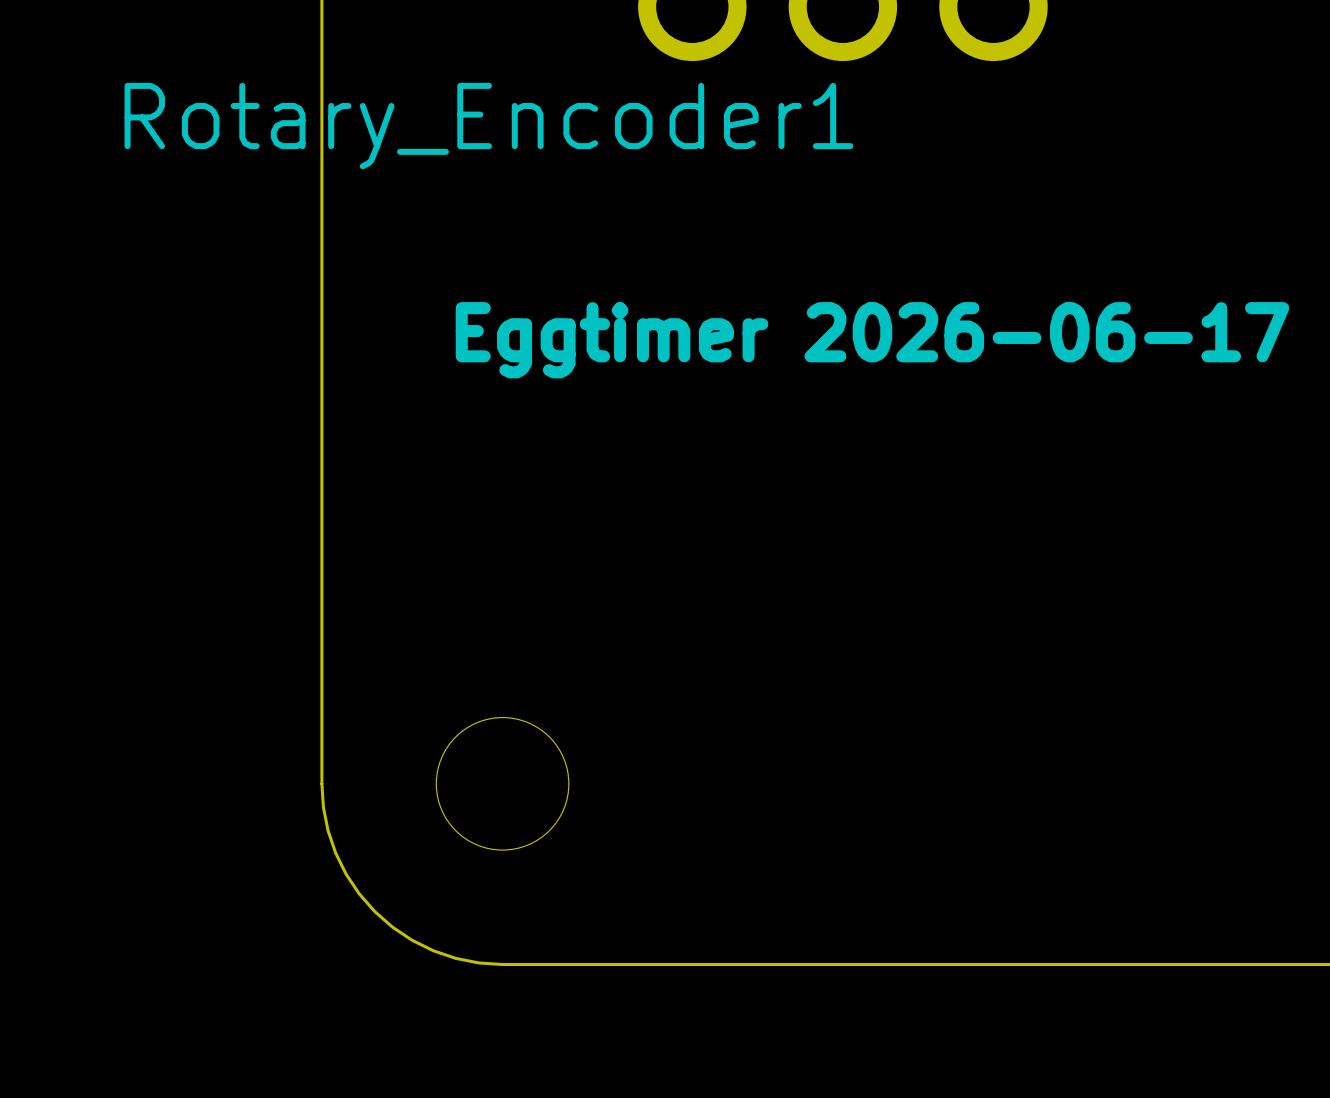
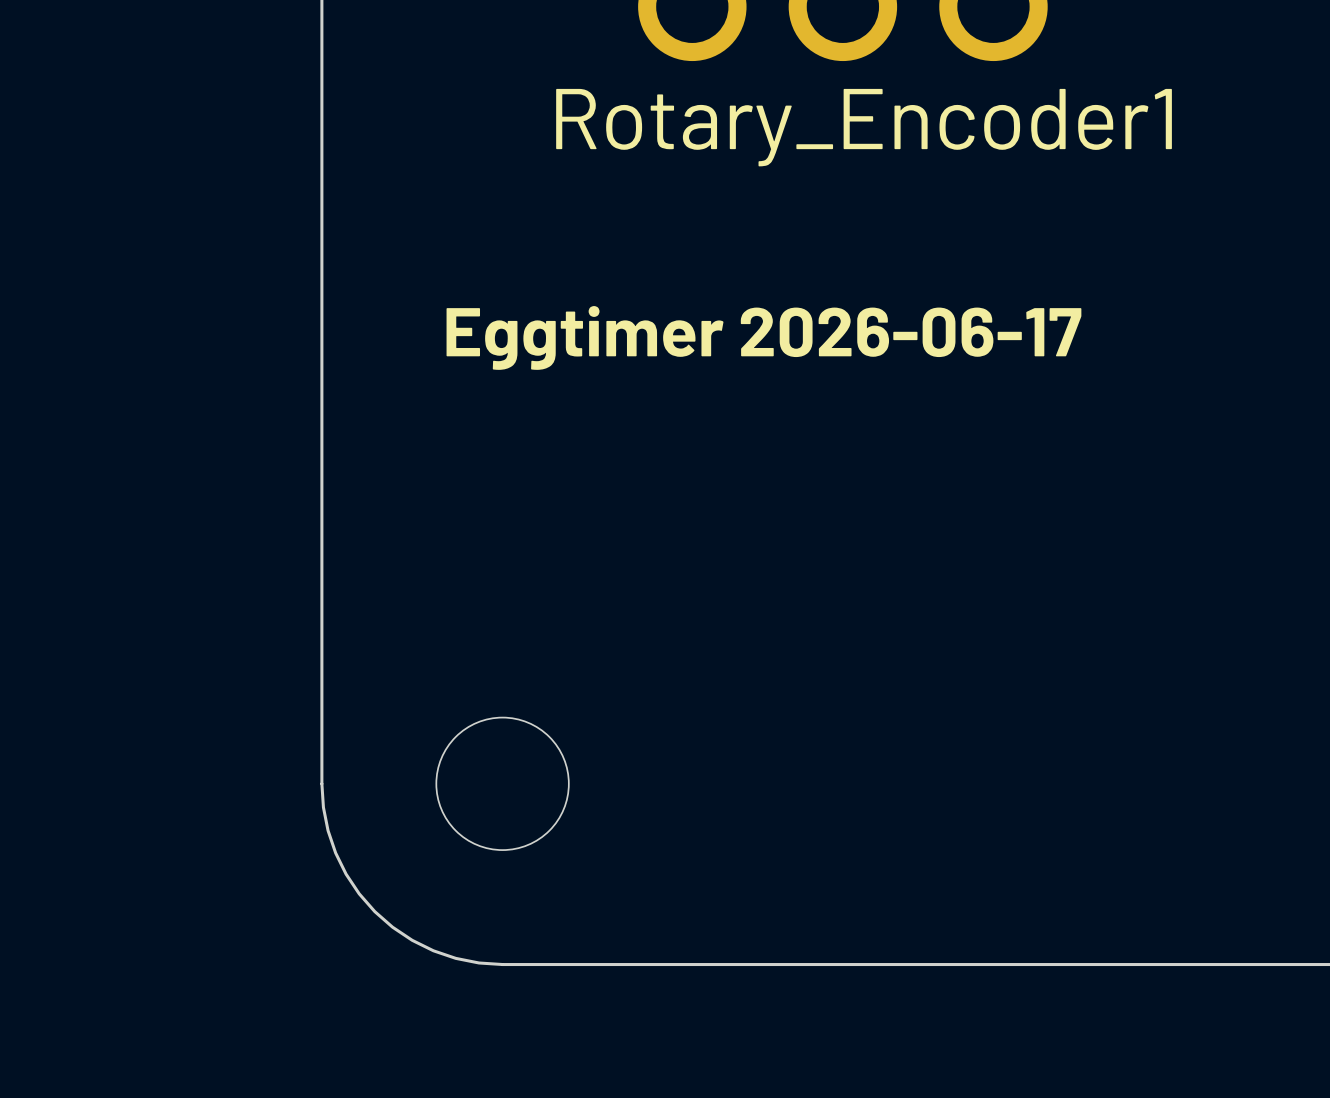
Rotary_Encoder1 name position: Rotary_Encoder1 (488, 126) -> Rotary_Encoder1 (864, 127)

